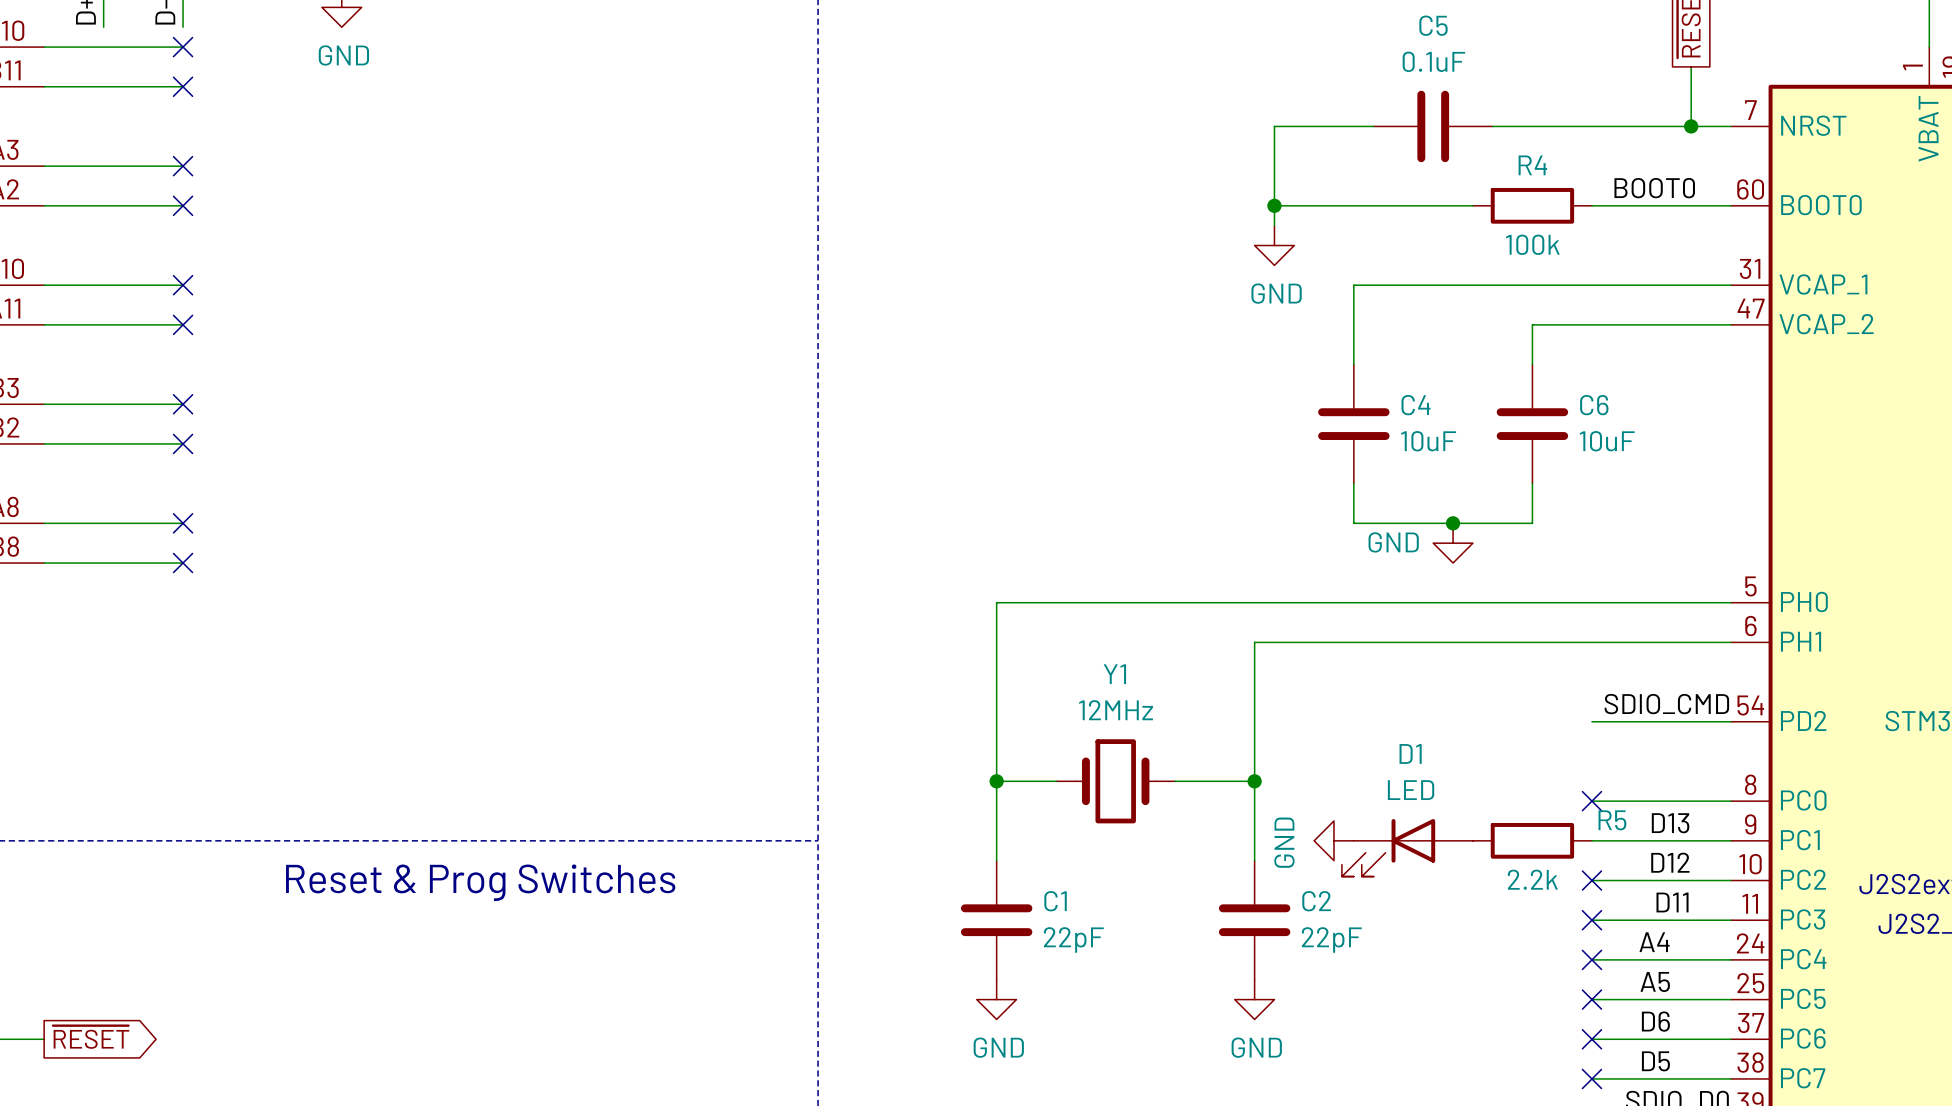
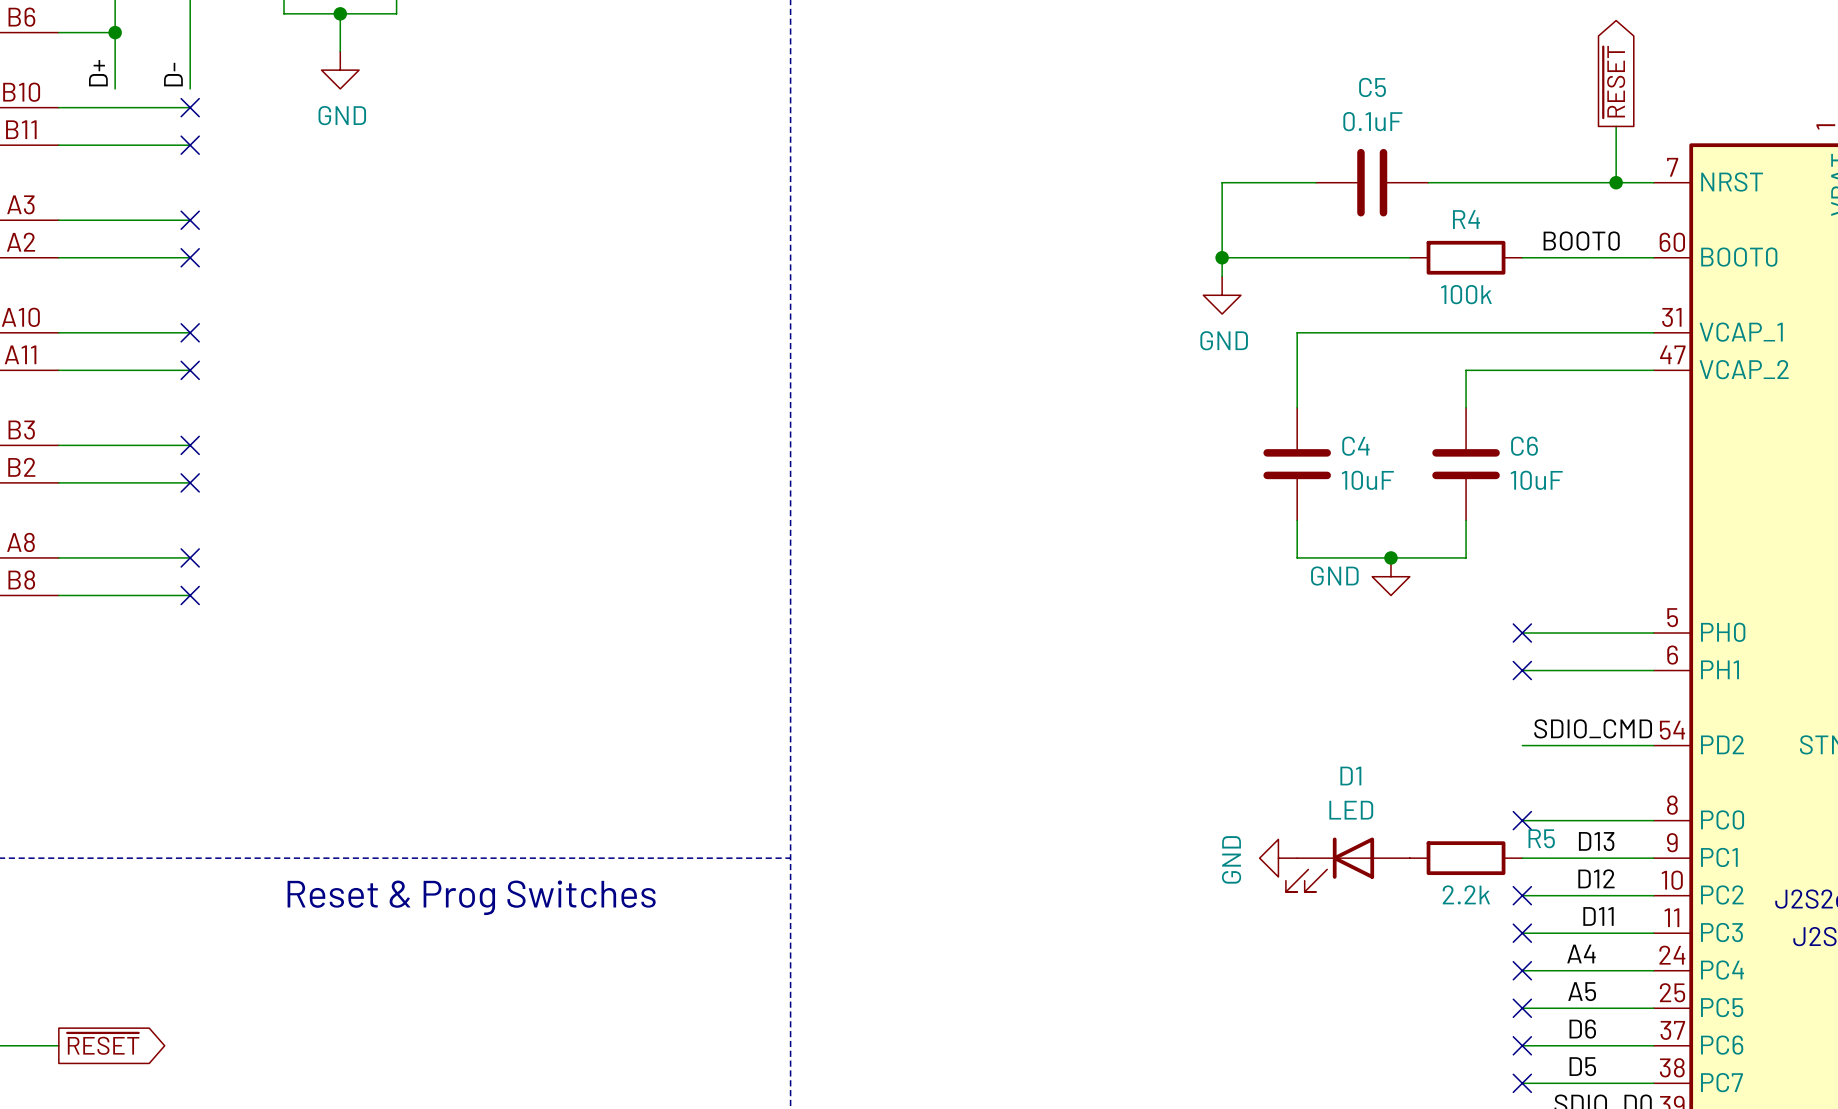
wire: (1591, 602) (996, 602) (996, 860) -> none
no-connect mark: none -> (1522, 633)
wire: (1591, 642) (1254, 642) (1254, 860) -> none
no-connect mark: none -> (1522, 670)
wire: (996, 781) (1056, 781) -> none
junction: (996, 781) -> none
Y1: 12MHz (1115, 781) -> none
wire: (1175, 781) (1254, 781) -> none
junction: (1254, 781) -> none
C1: 22pF (996, 920) -> none
C2: 22pF (1254, 920) -> none
power symbol: GND (996, 999) -> none
power symbol: GND (1254, 999) -> none

